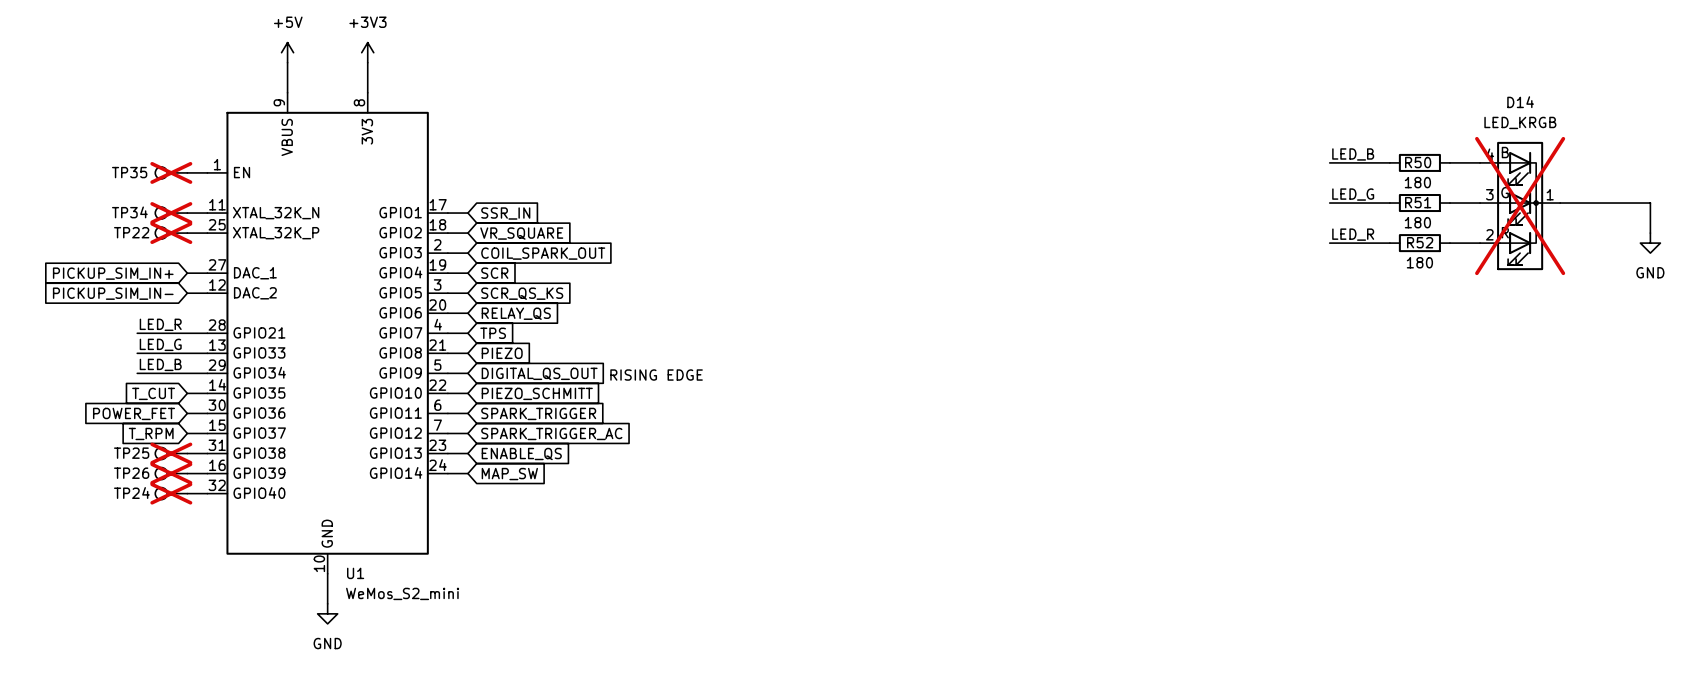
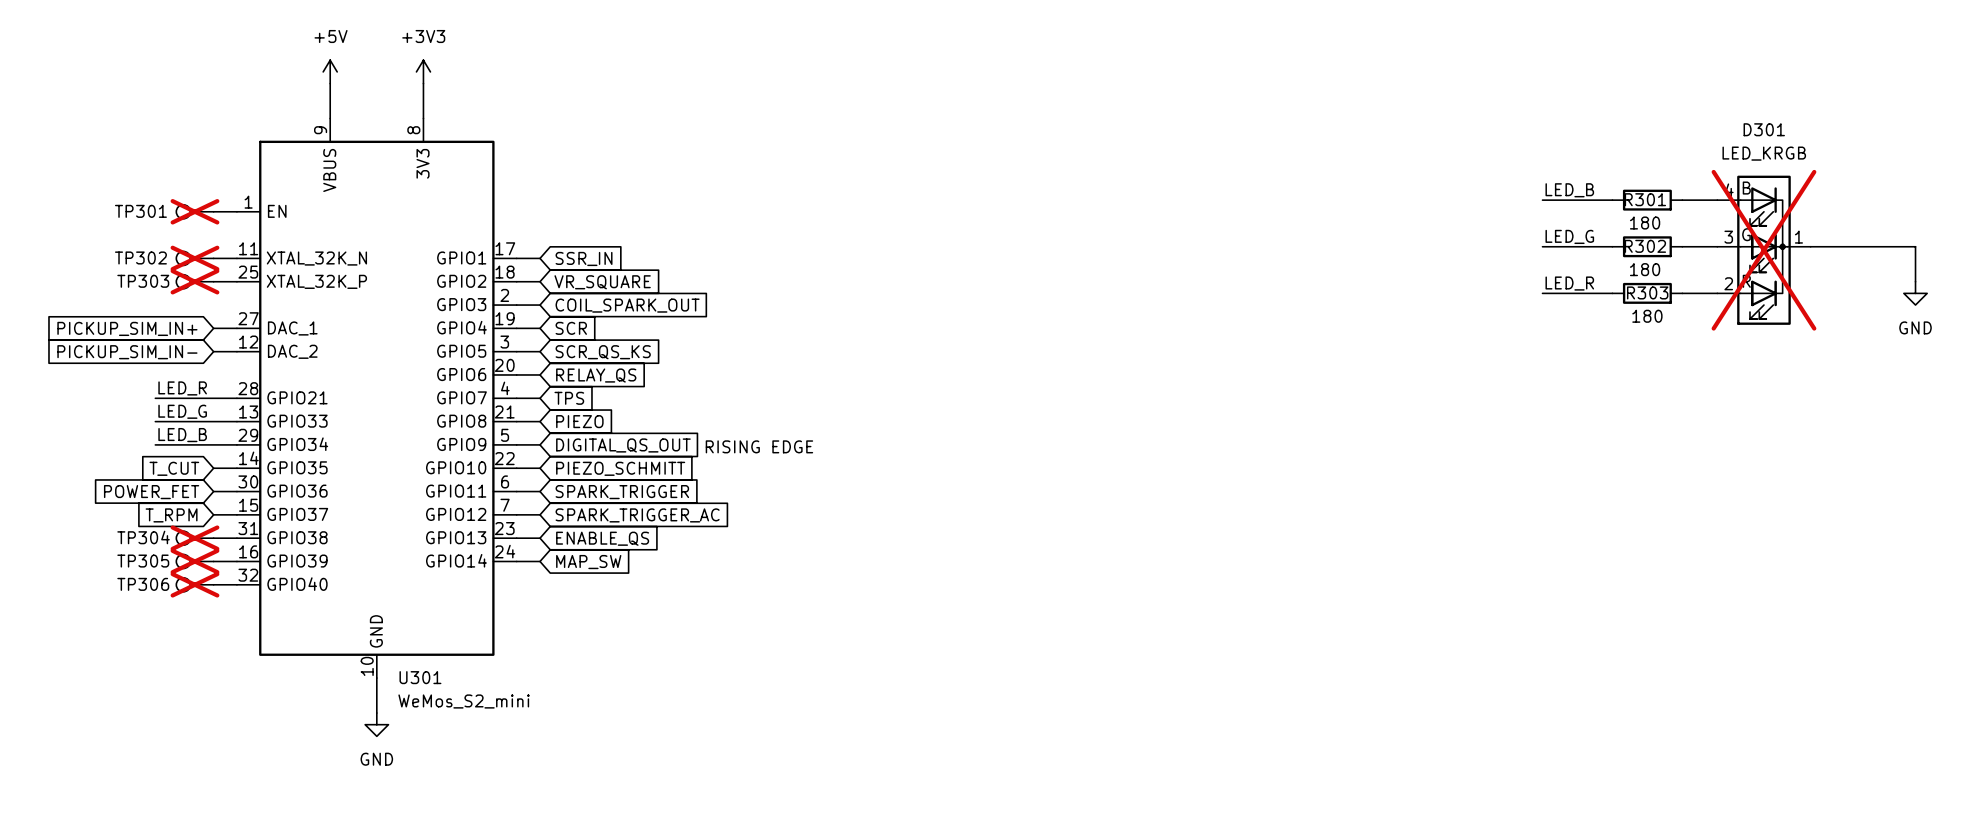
D14 name: D14 (1520, 102) -> D301 (1764, 129)
R50 name: R50 (1418, 162) -> R301 (1645, 199)
TP35 name: TP35 (129, 172) -> TP301 (140, 211)
R51 name: R51 (1418, 202) -> R302 (1645, 246)
TP34 name: TP34 (129, 212) -> TP302 (140, 257)
TP22 name: TP22 (131, 232) -> TP303 (143, 281)
R52 name: R52 (1420, 242) -> R303 (1647, 292)
TP25 name: TP25 (131, 453) -> TP304 (143, 537)
TP26 name: TP26 (131, 473) -> TP305 (143, 561)
TP24 name: TP24 (131, 493) -> TP306 (143, 584)
U1 name: U1 (355, 573) -> U301 (420, 677)

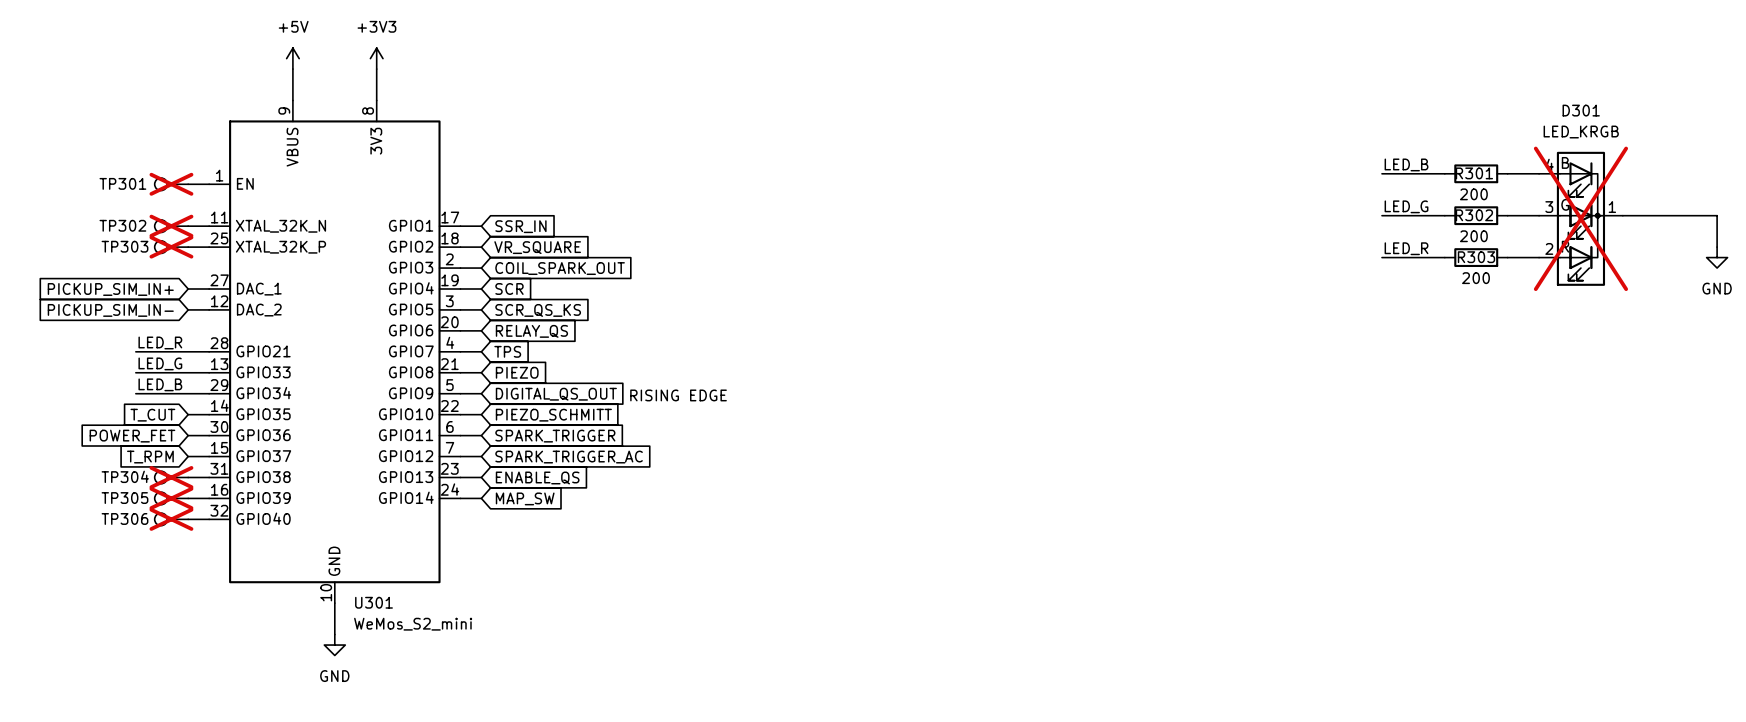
R301 value: 180 (1645, 223) -> 200 (1473, 194)
R302 value: 180 (1645, 269) -> 200 (1473, 236)
R303 value: 180 (1647, 316) -> 200 (1475, 278)

